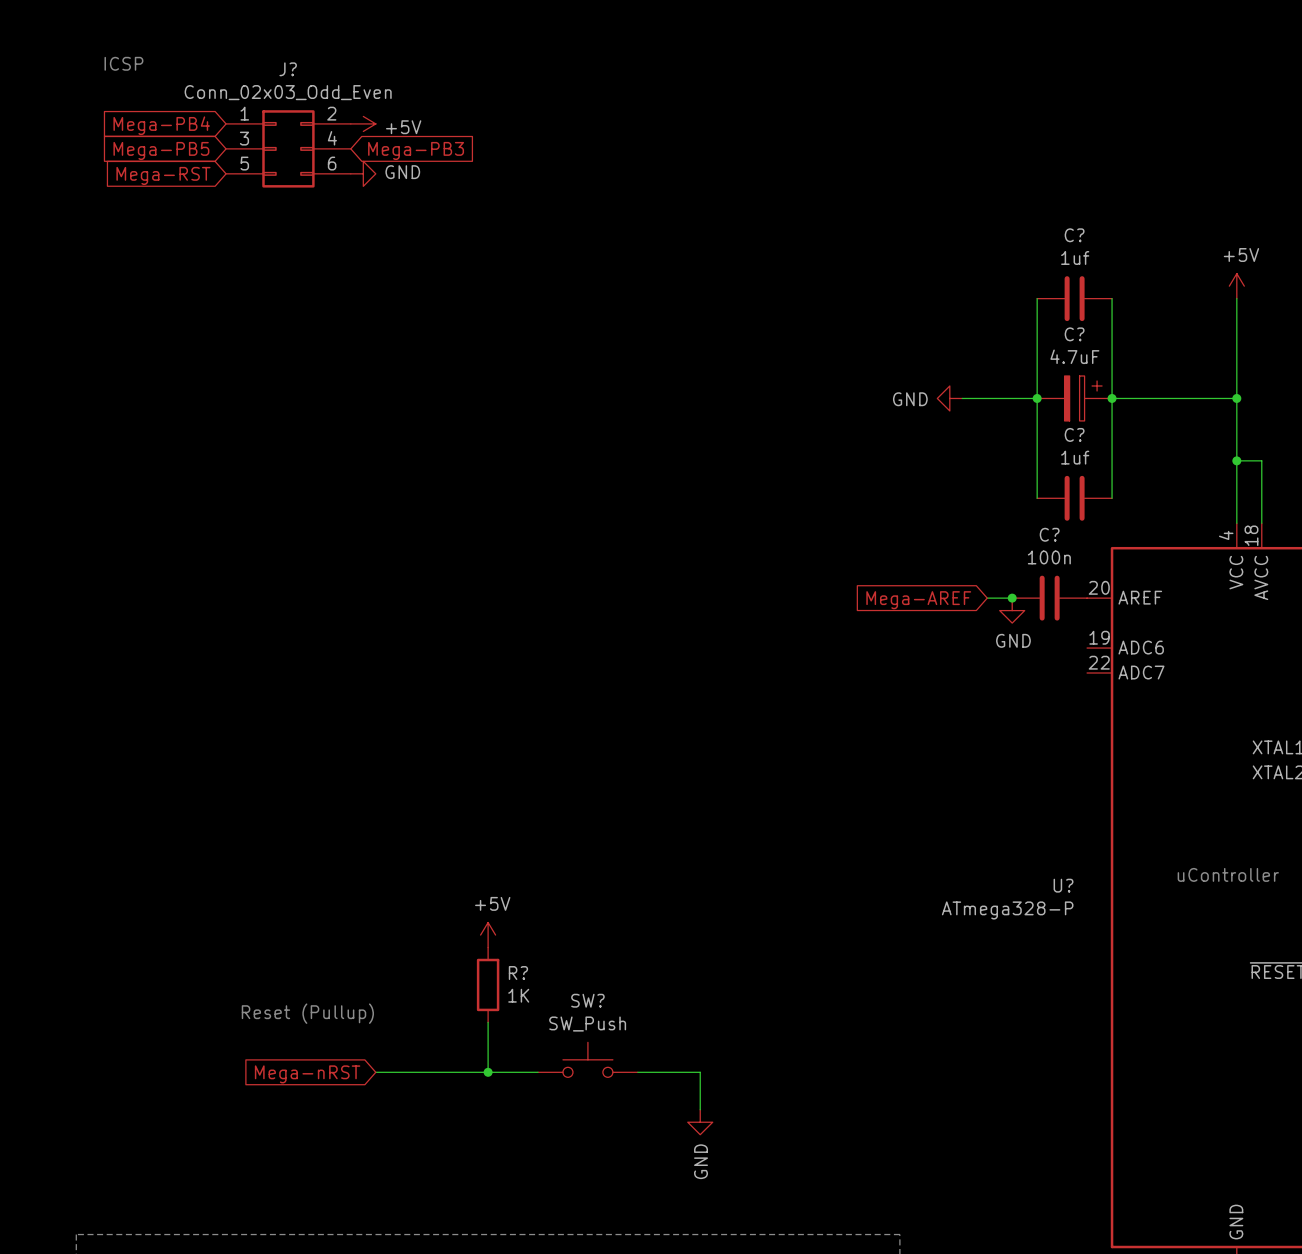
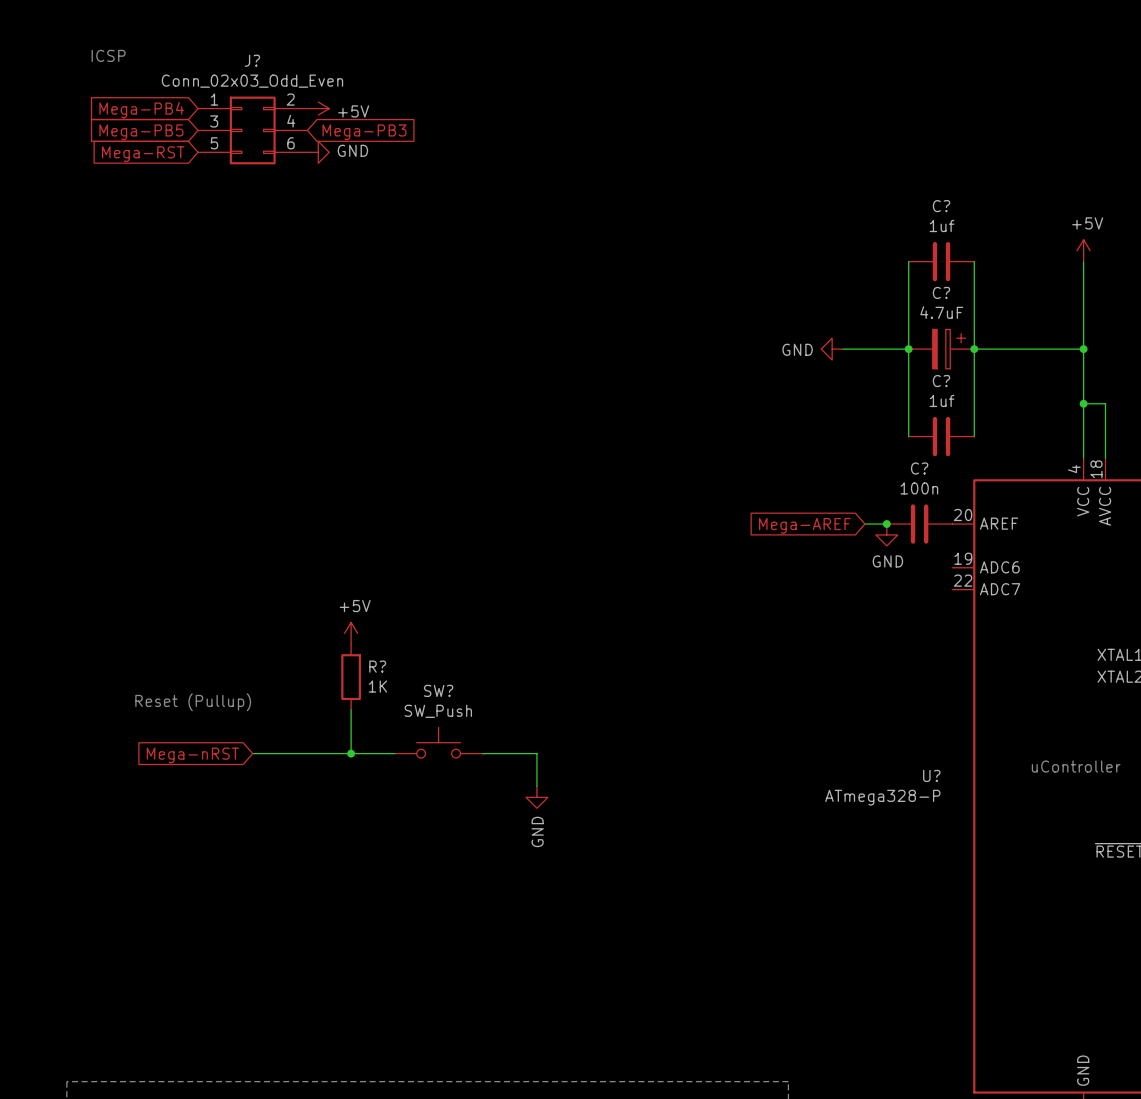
junction: none -> (351, 753)
power symbol position: +5V (488, 935) -> +5V (351, 633)
R? position: (488, 984) -> (351, 677)
text position: Reset (Pullup) (307, 1013) -> Reset (Pullup) (193, 702)
wire: (488, 1022) (488, 1072) -> (351, 709) (351, 753)
SW? position: (587, 1059) -> (438, 742)
wire: (375, 1072) (538, 1072) -> (252, 753) (394, 753)
junction: (488, 1072) -> none
wire: (637, 1072) (700, 1072) (700, 1109) -> (482, 753) (536, 753) (536, 786)
global label position: Mega-nRST (307, 1074) -> Mega-nRST (192, 755)
power symbol position: GND (700, 1122) -> GND (536, 797)

